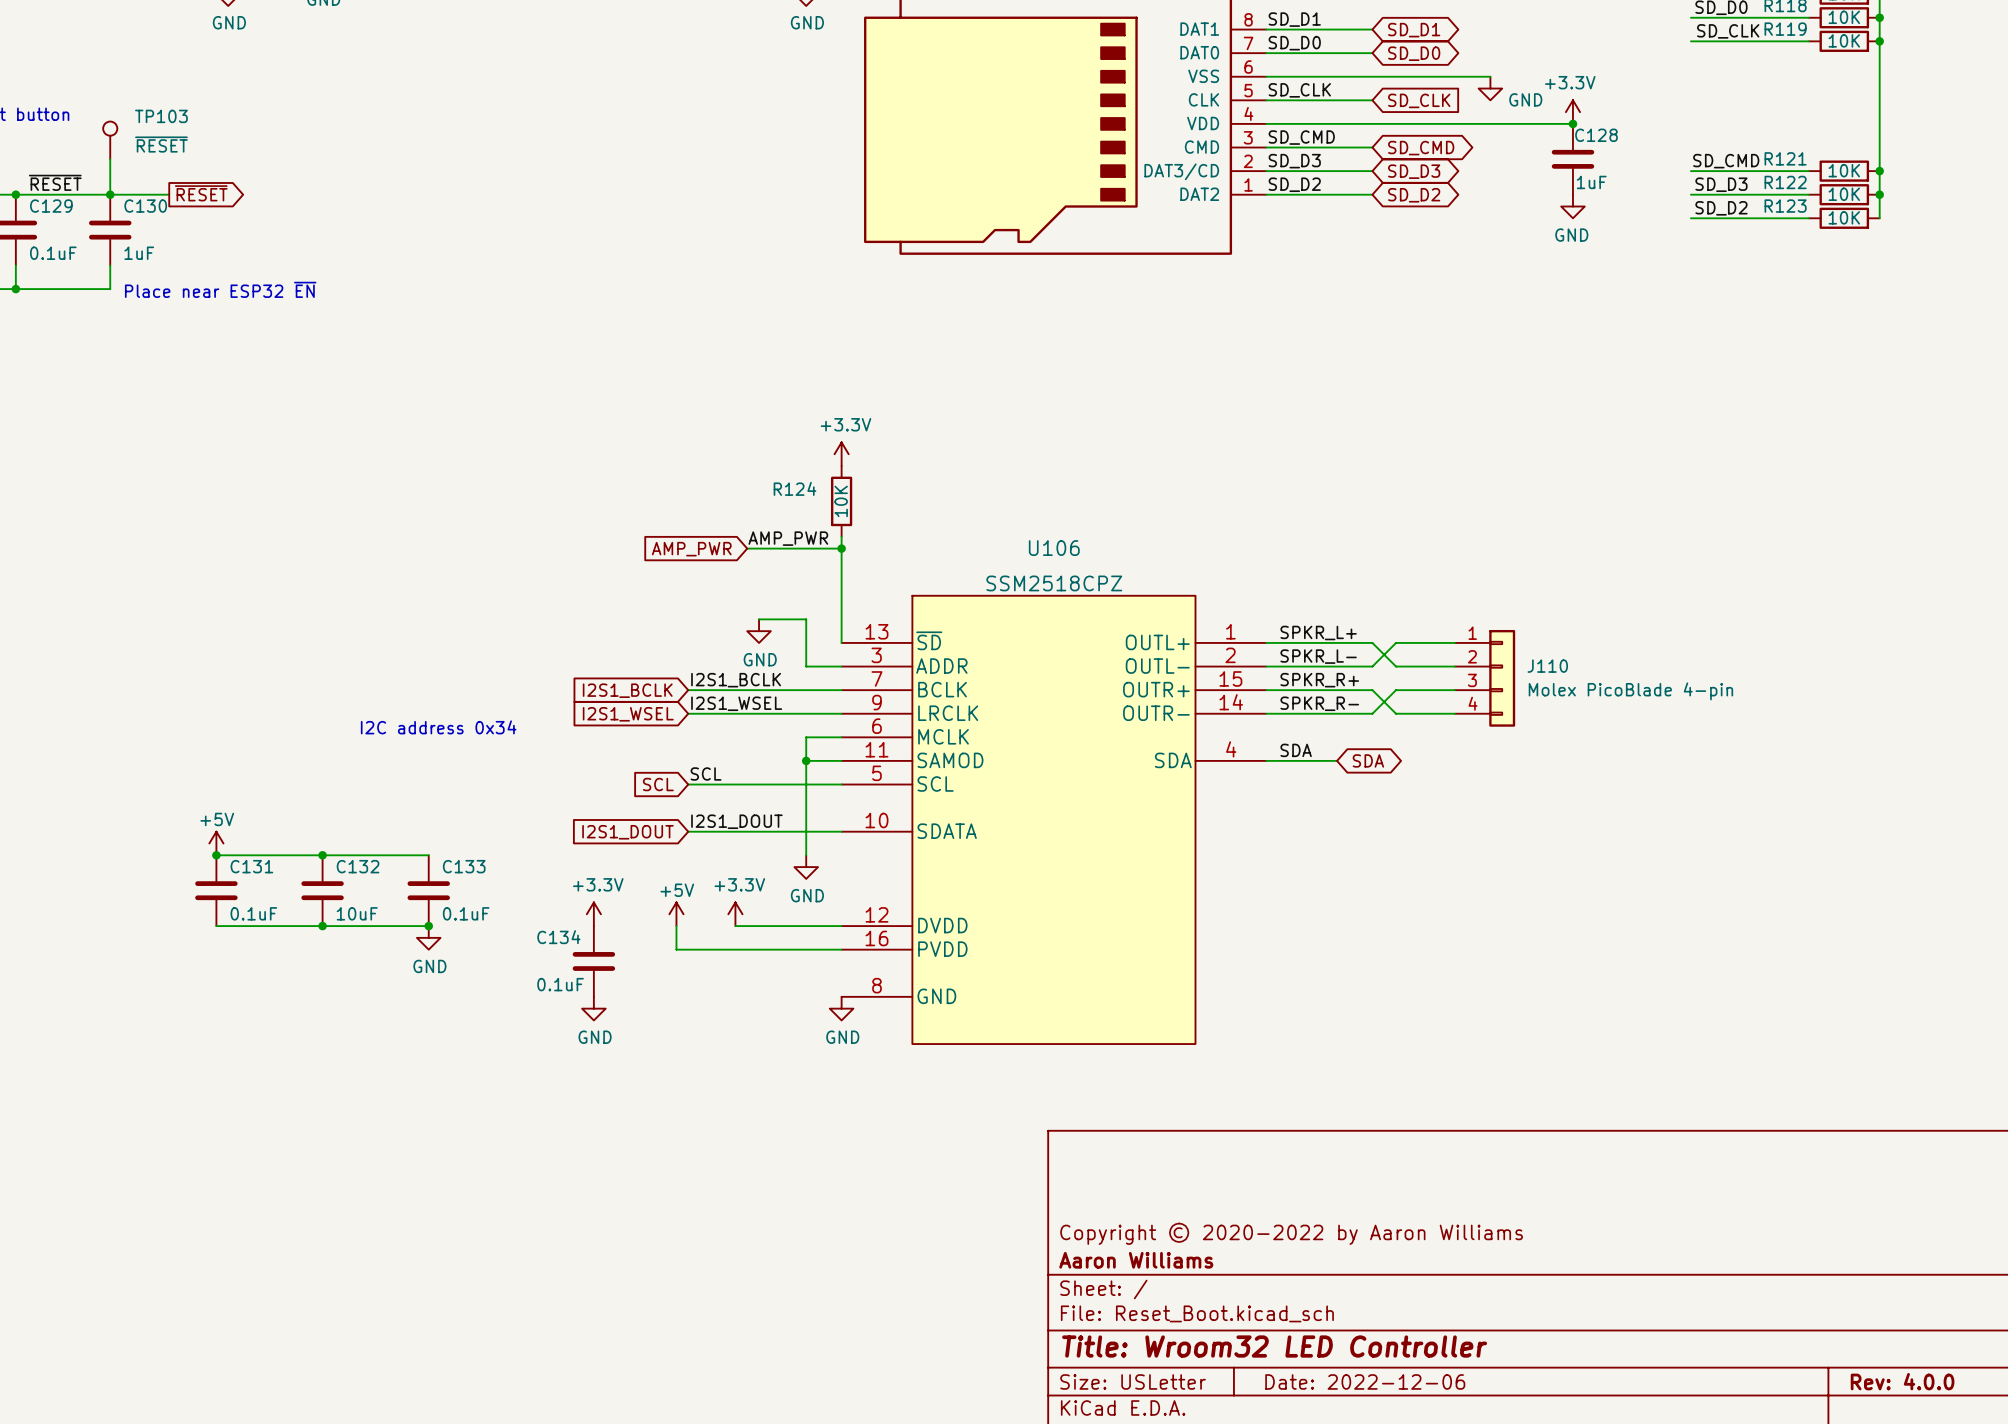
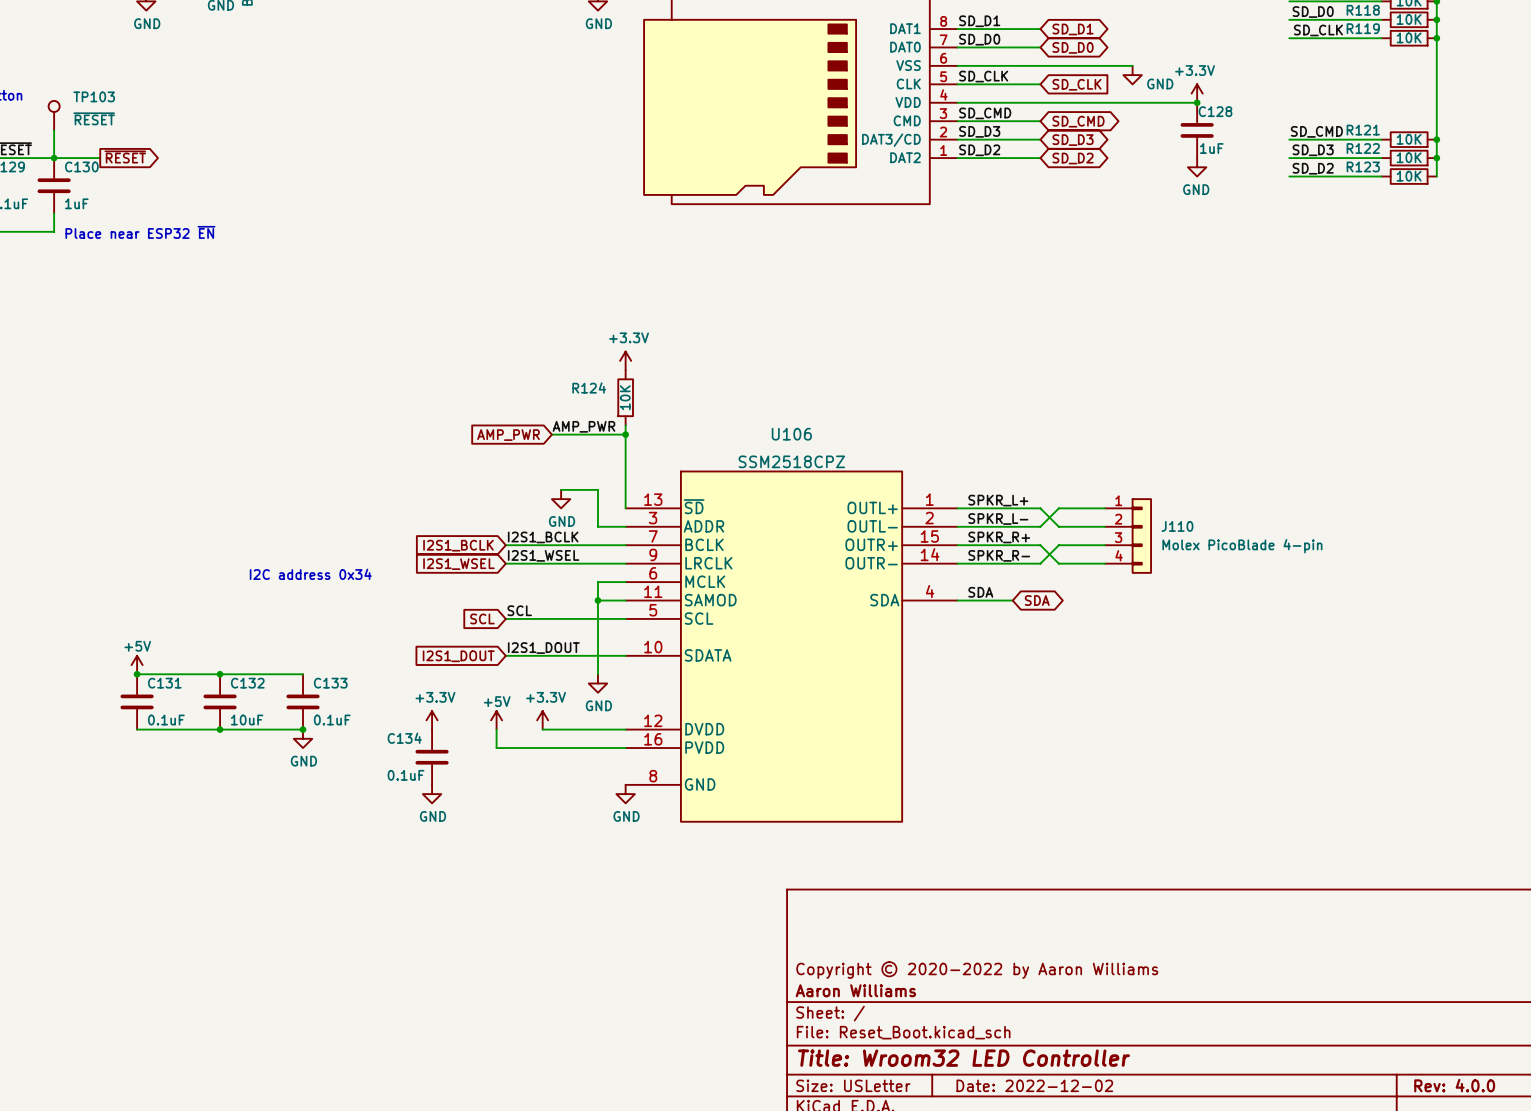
title block: Date: 2022-12-06 (1365, 1381) -> Date: 2022-12-02 (1034, 1085)

